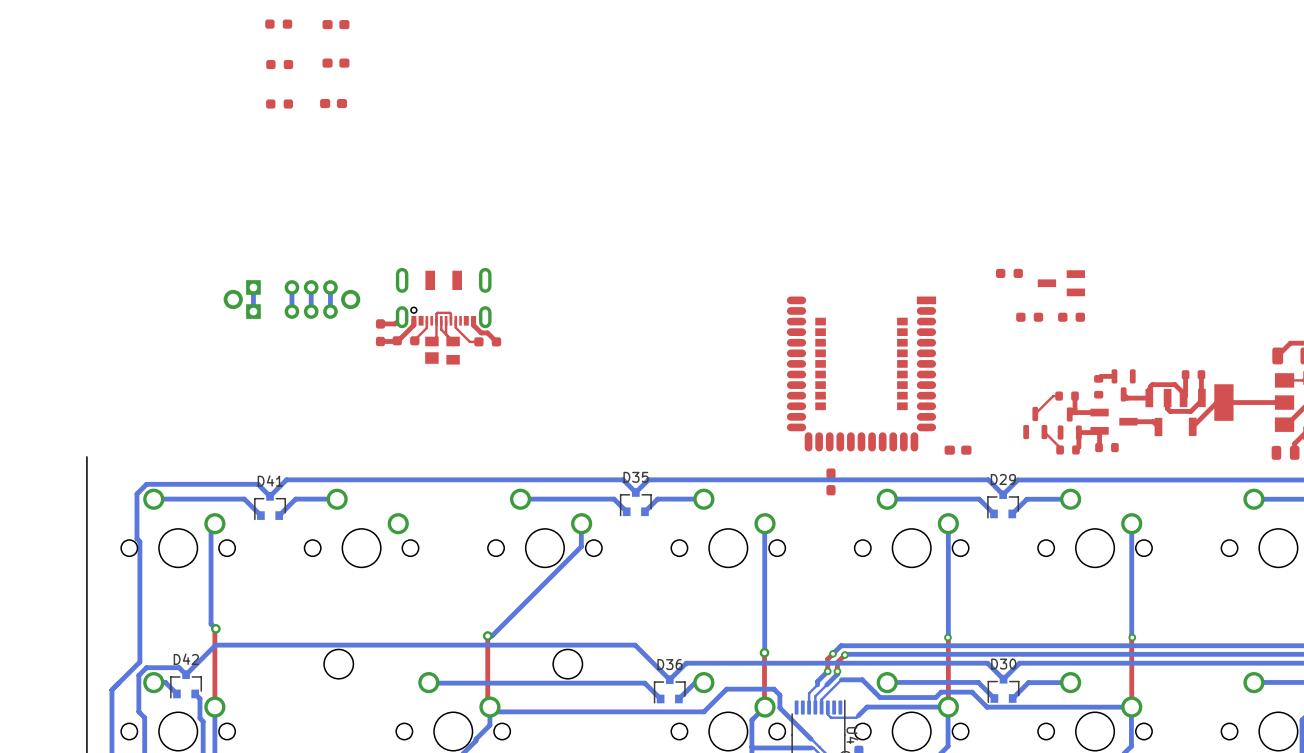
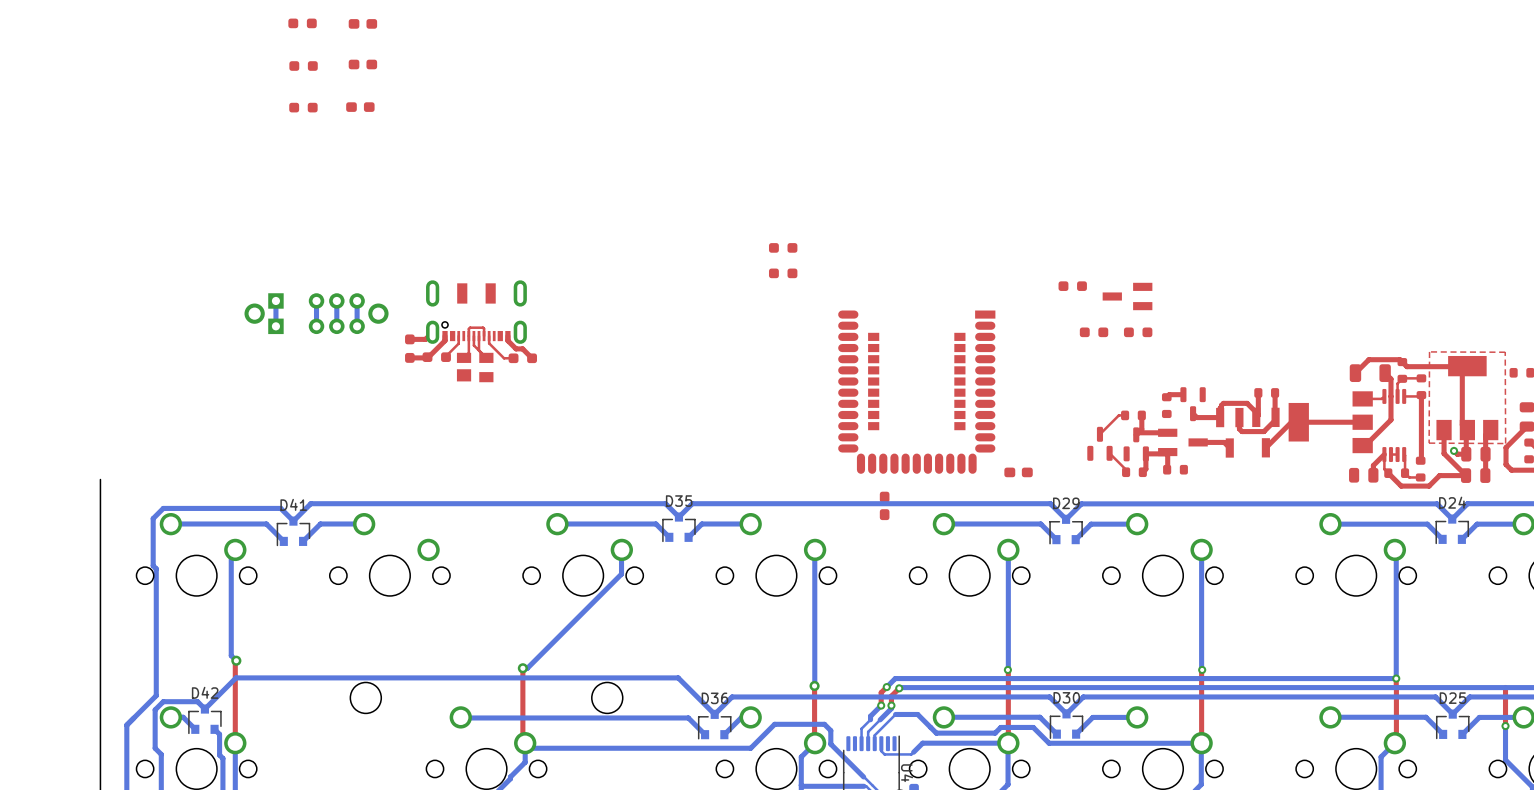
part: none -> (783, 247)
part: none -> (783, 273)

